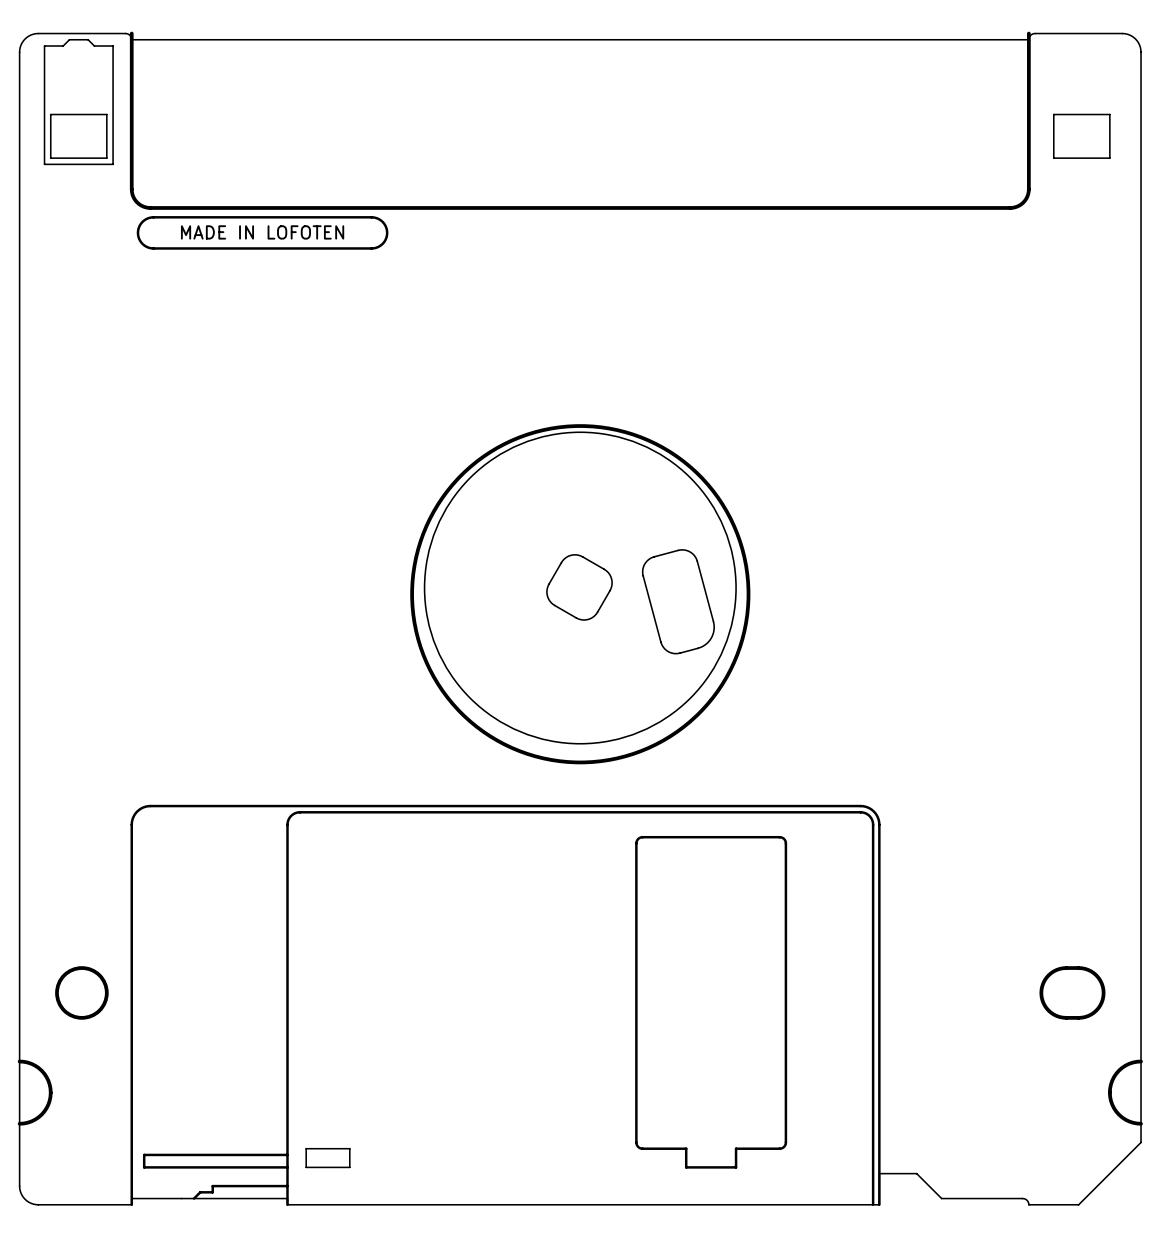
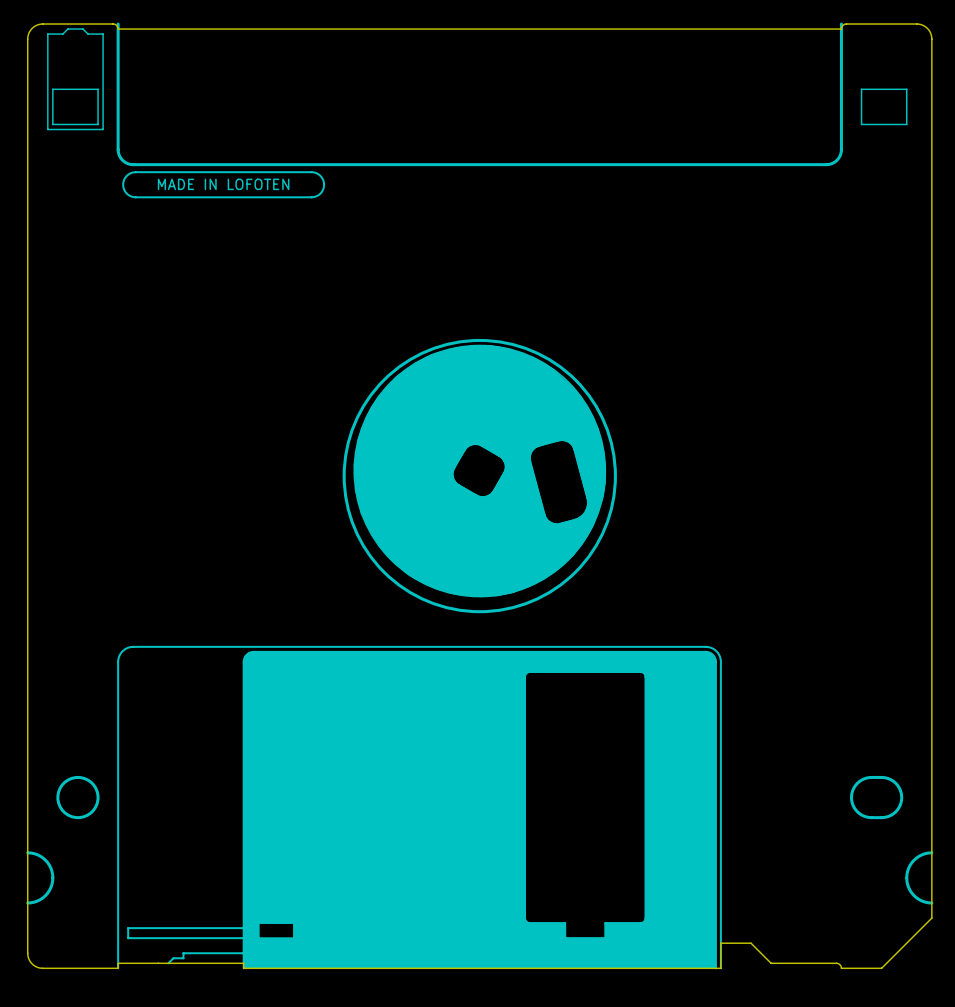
drawing: none -> [353, 344, 606, 598]
drawing: none -> [243, 651, 717, 969]

